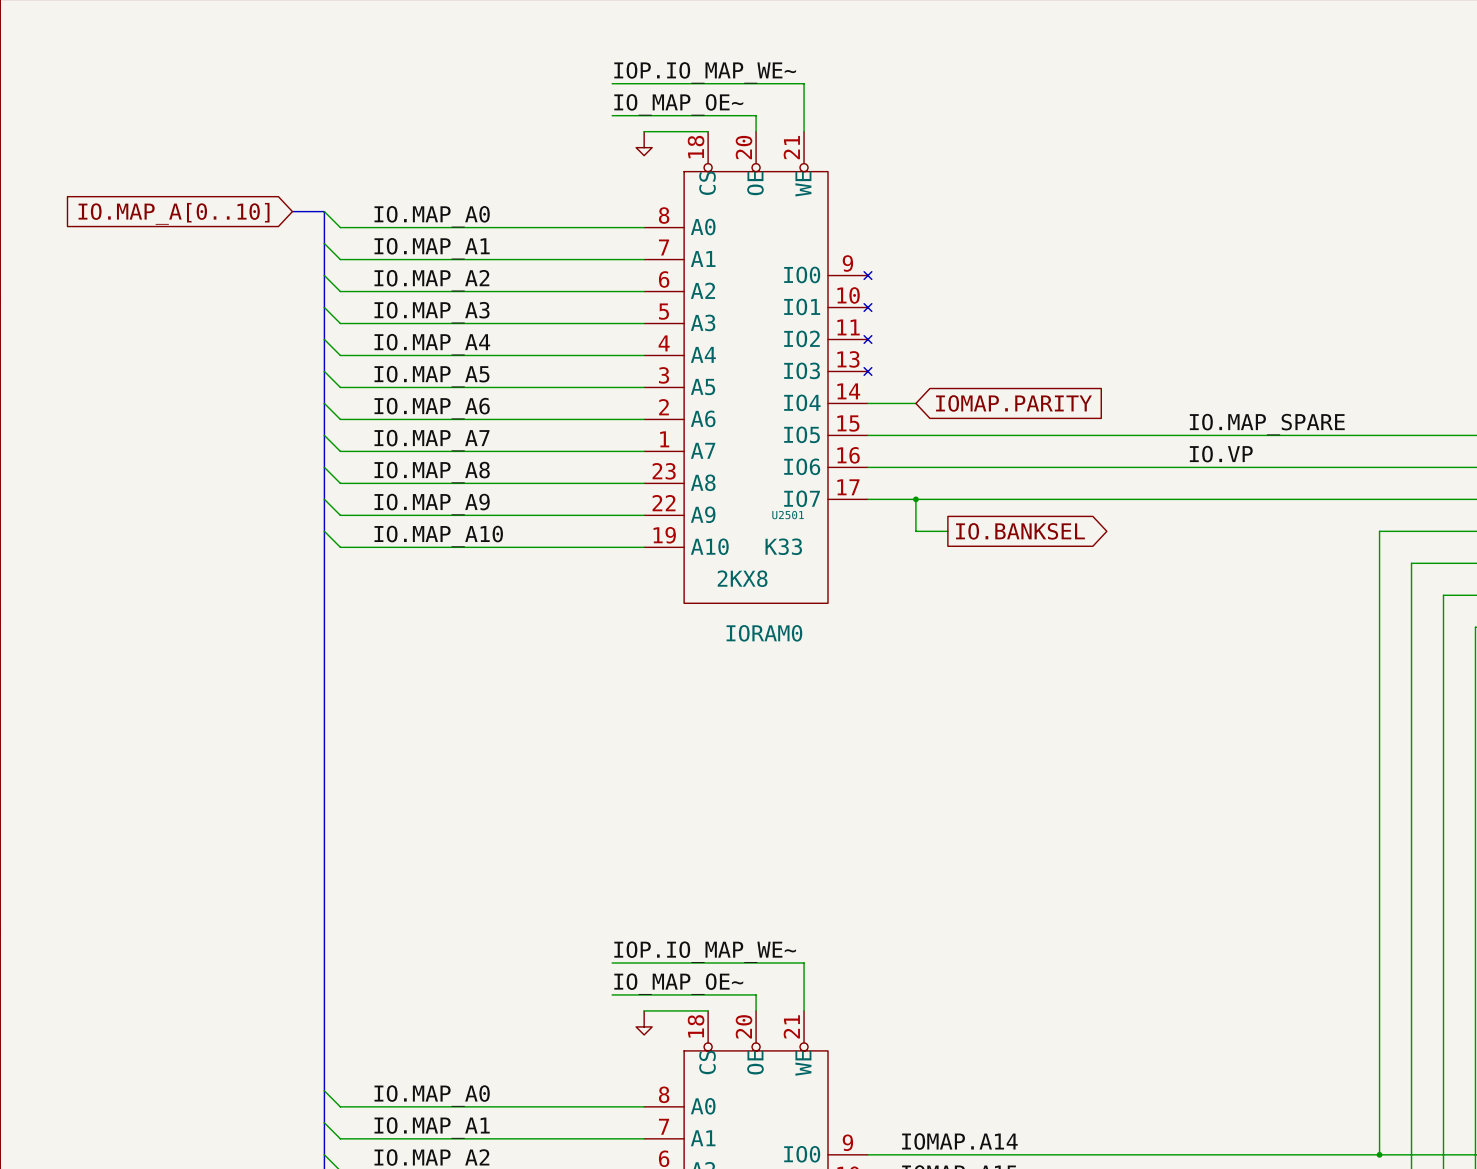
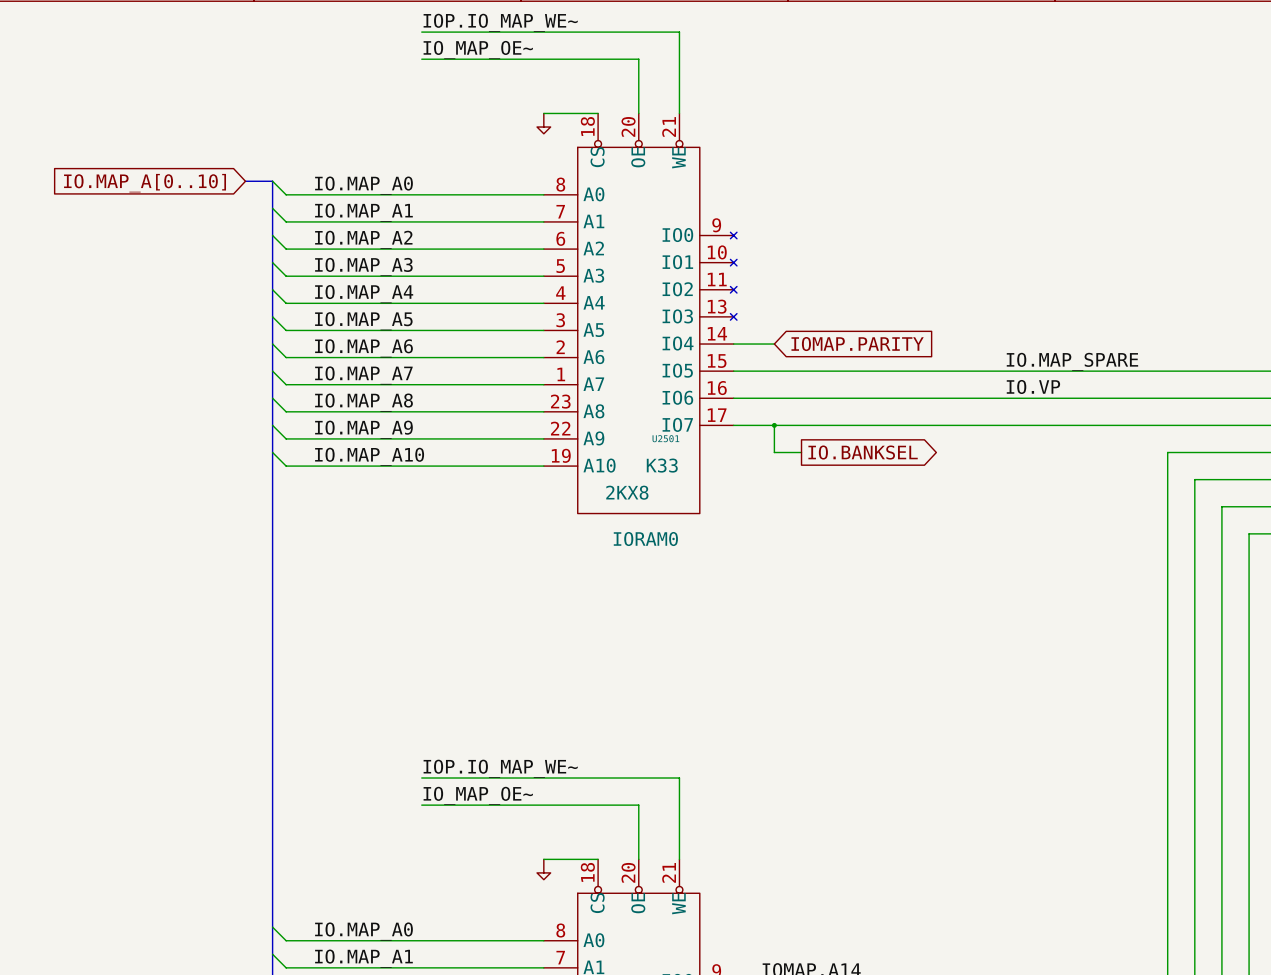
label position: IOP.IO_MAP_WE~ (705, 72) -> IOP.IO_MAP_WE~ (500, 22)
wire: (612, 83) (804, 83) -> (421, 32) (679, 32) (679, 72)
label position: IO_MAP_OE~ (678, 104) -> IO_MAP_OE~ (478, 49)
wire: (612, 115) (756, 115) -> (421, 59) (638, 59) (638, 99)
label position: IOP.IO_MAP_WE~ (705, 952) -> IOP.IO_MAP_WE~ (500, 768)
wire: (612, 962) (804, 962) -> (421, 778) (679, 778) (679, 818)
label position: IO_MAP_OE~ (678, 984) -> IO_MAP_OE~ (478, 795)
wire: (612, 994) (756, 994) -> (421, 805) (638, 805) (638, 845)

